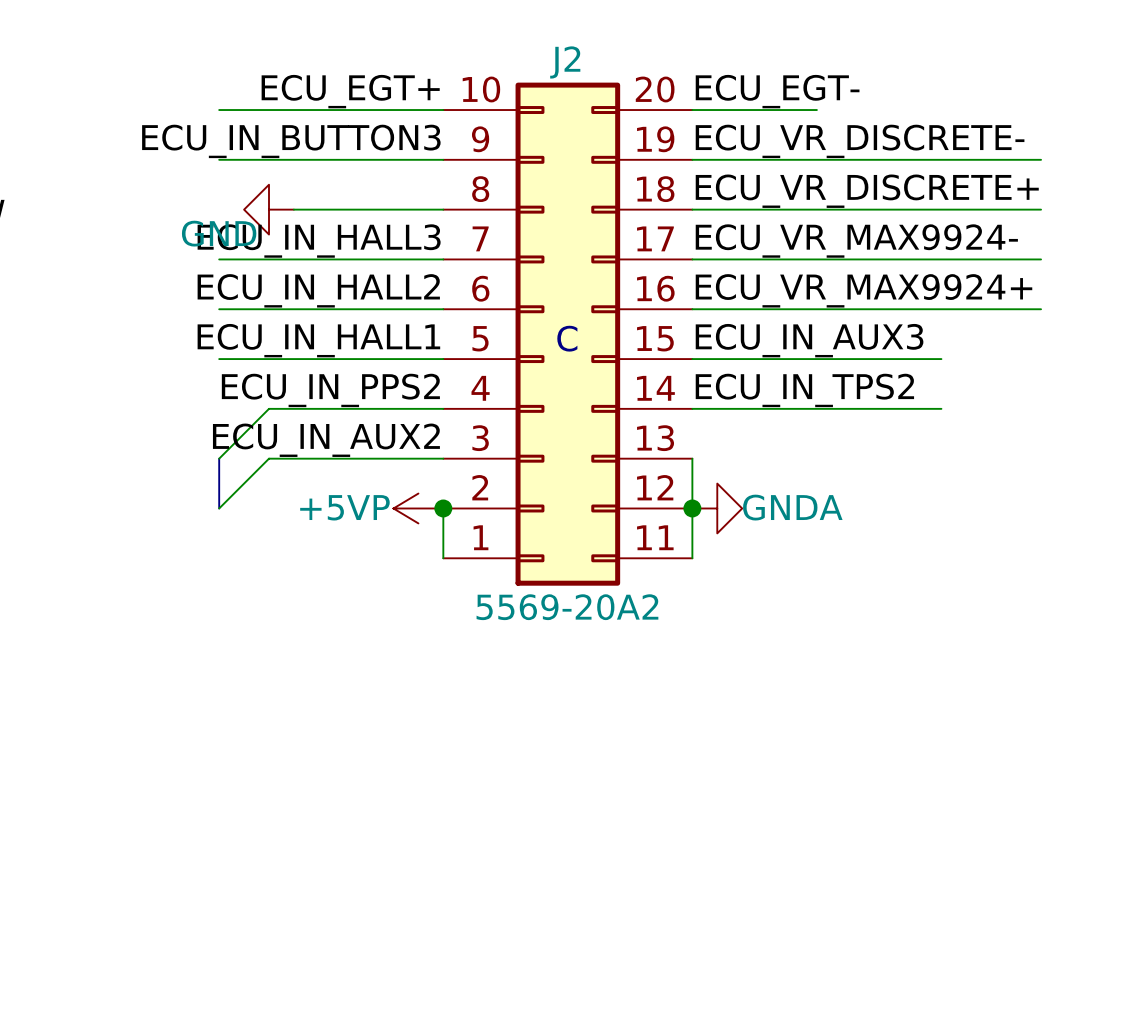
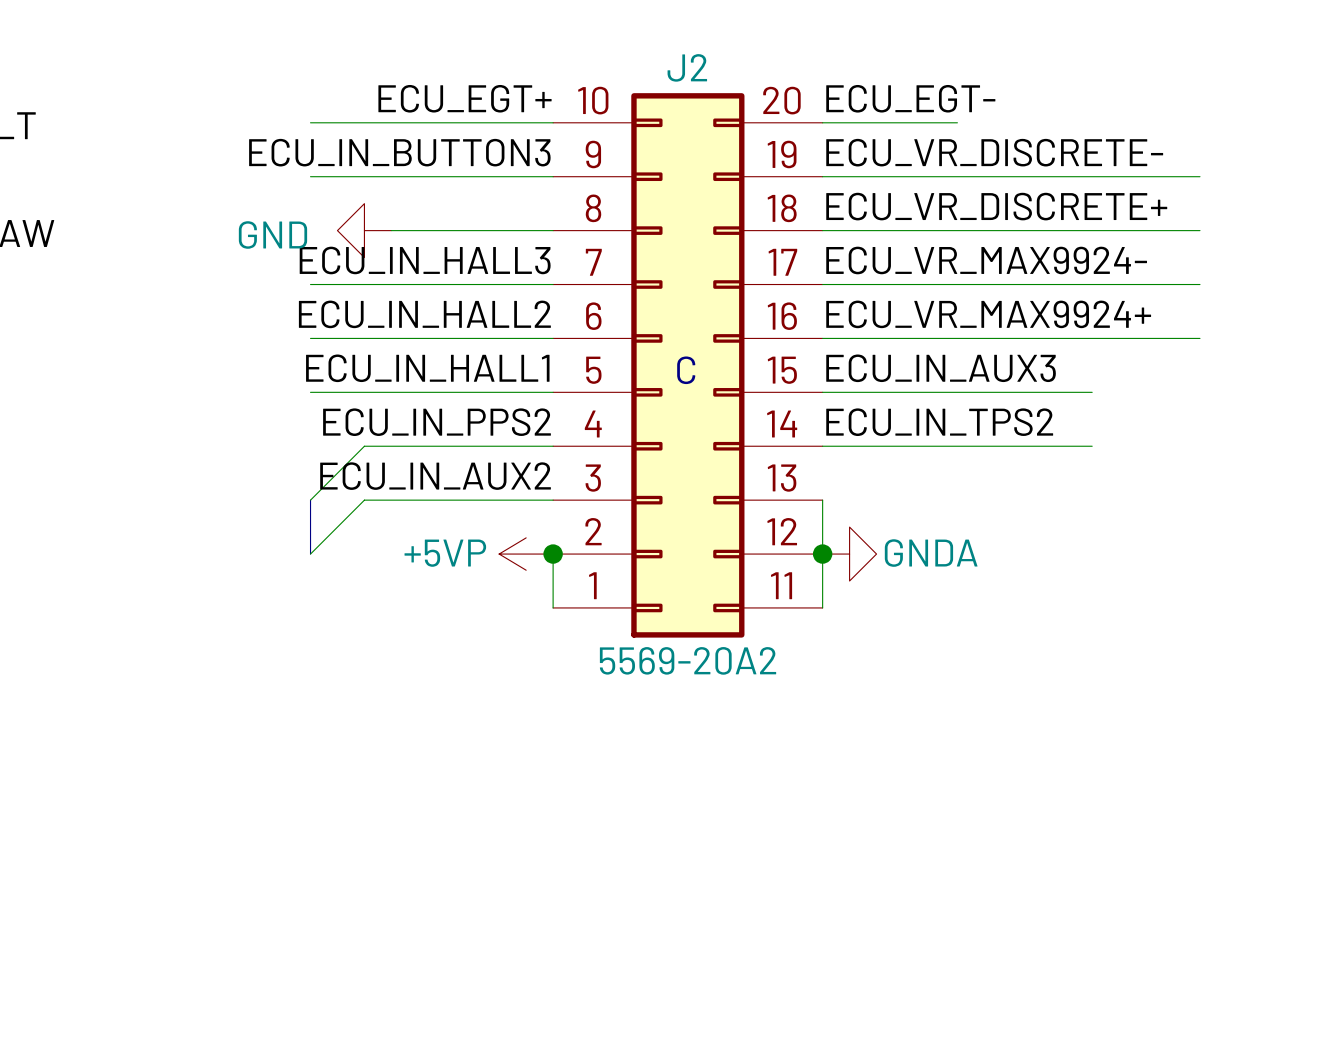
power symbol text position: GND (219, 233) -> GND (272, 234)

